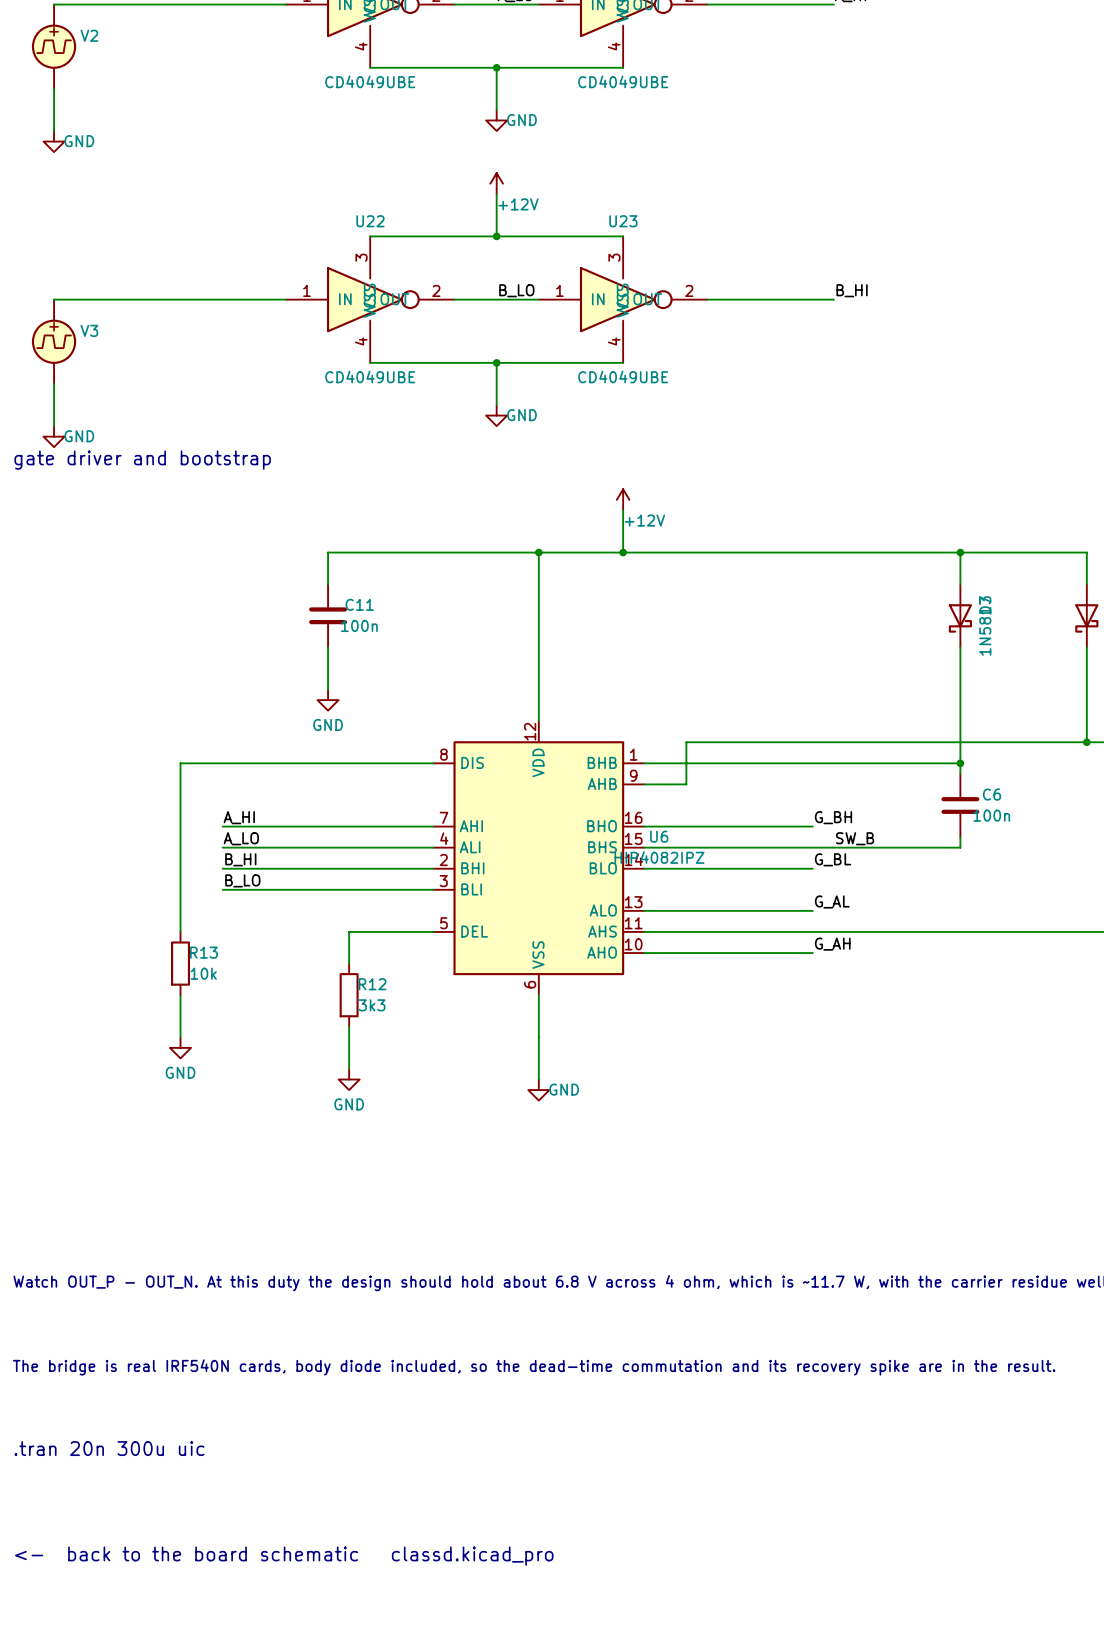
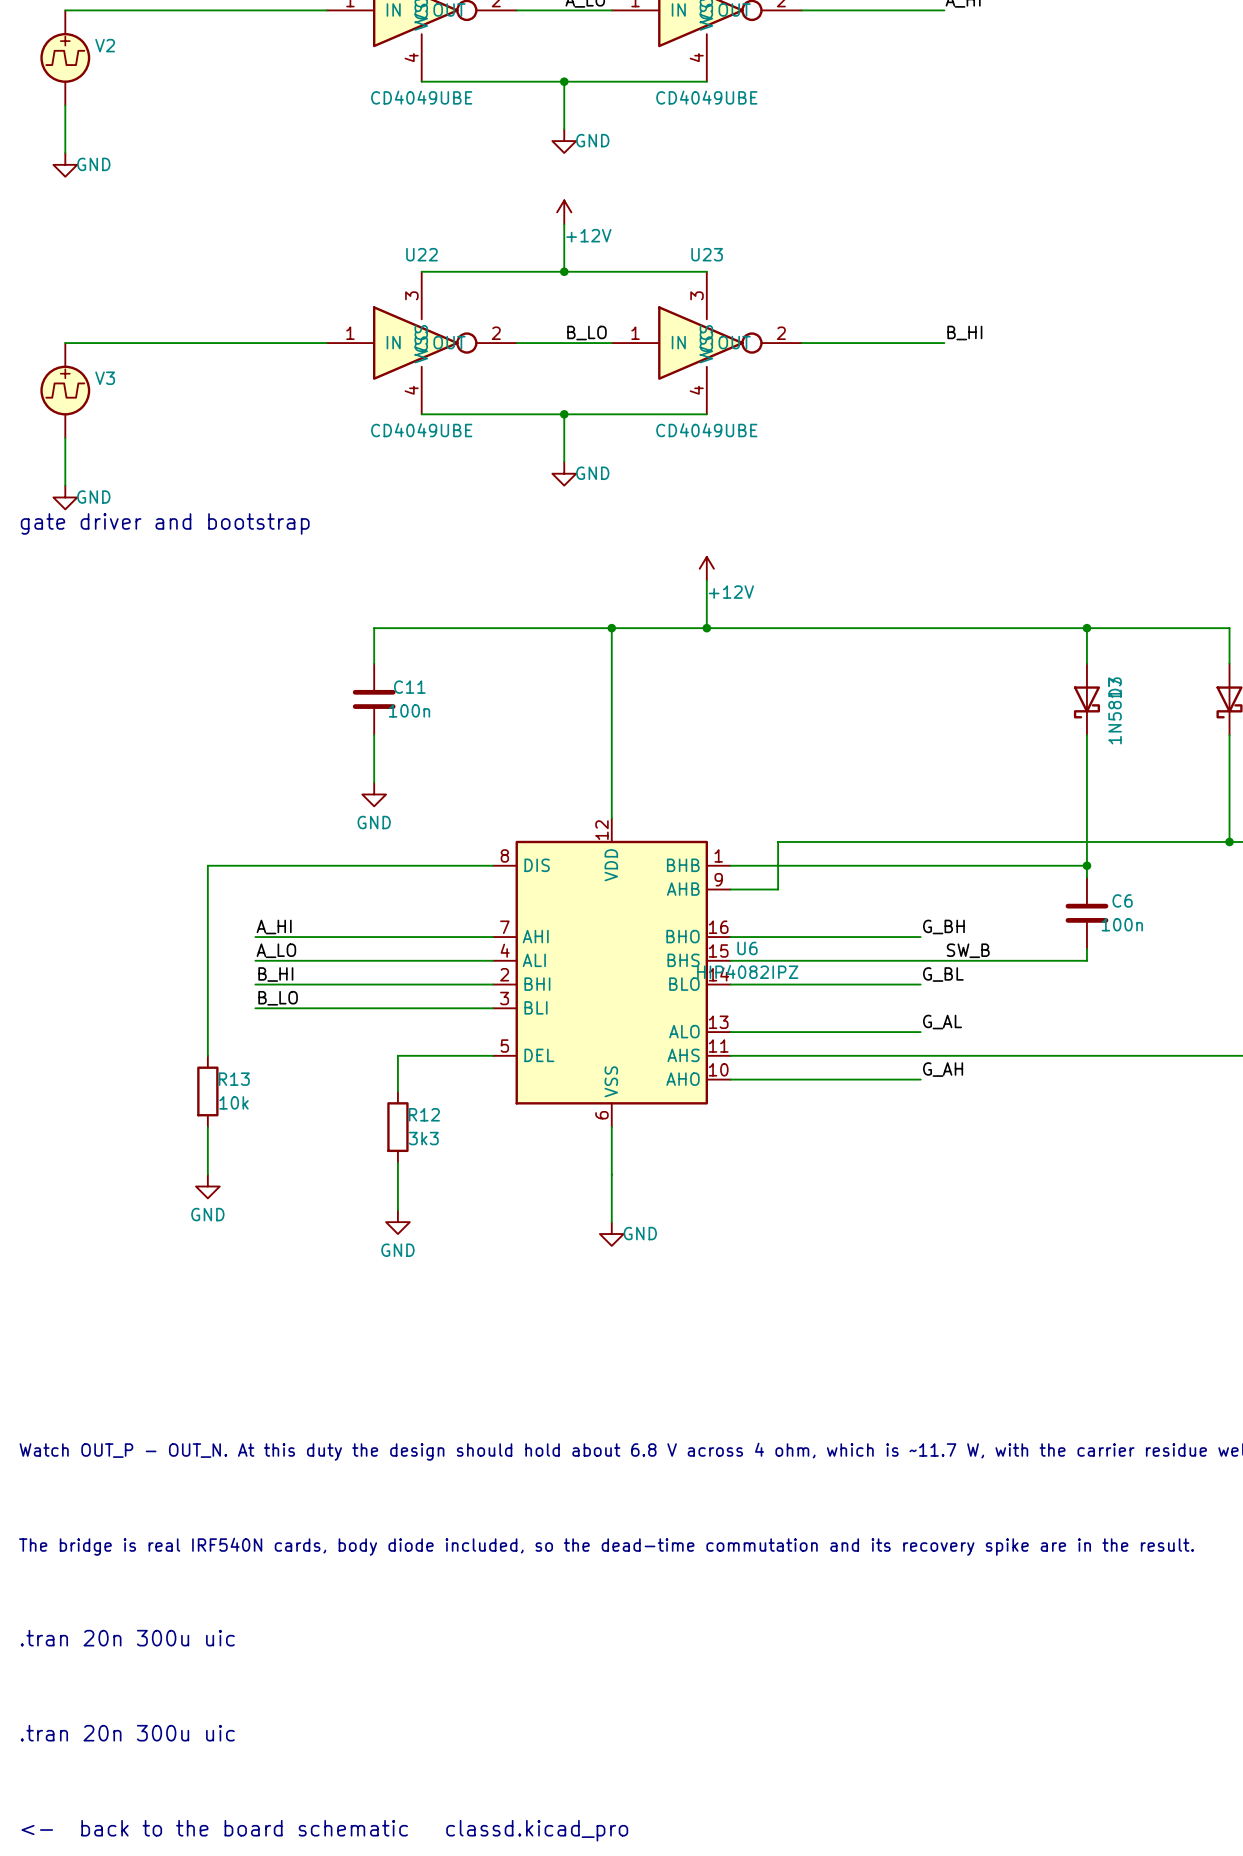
text: none -> .tran 20n 300u uic (127, 1733)
text position: <- back to the board schematic classd.kicad_pro (284, 1556) -> <- back to the board schematic classd.kicad_pro (324, 1830)

